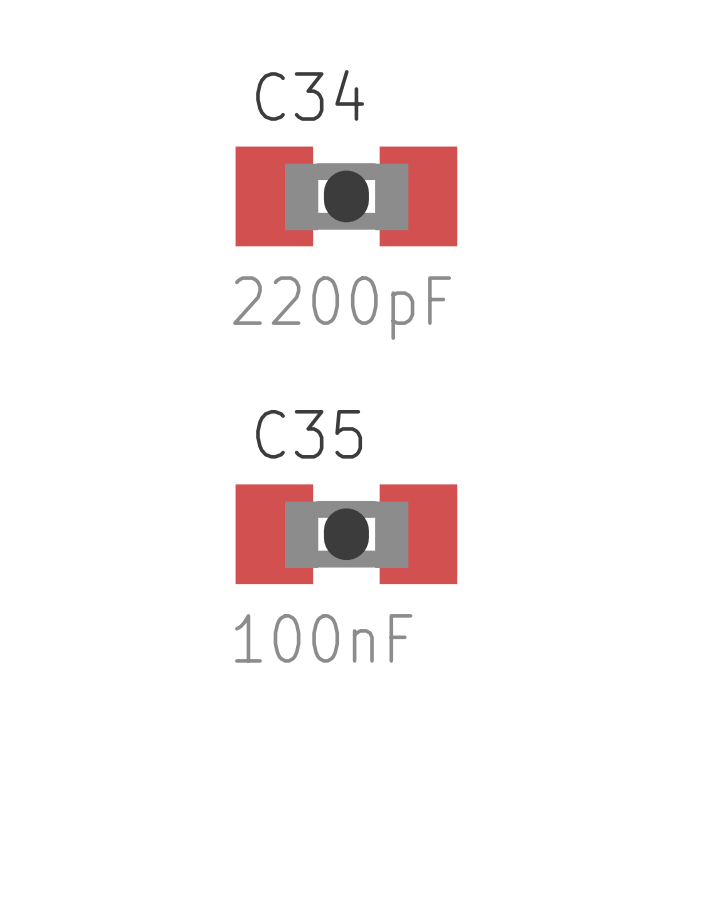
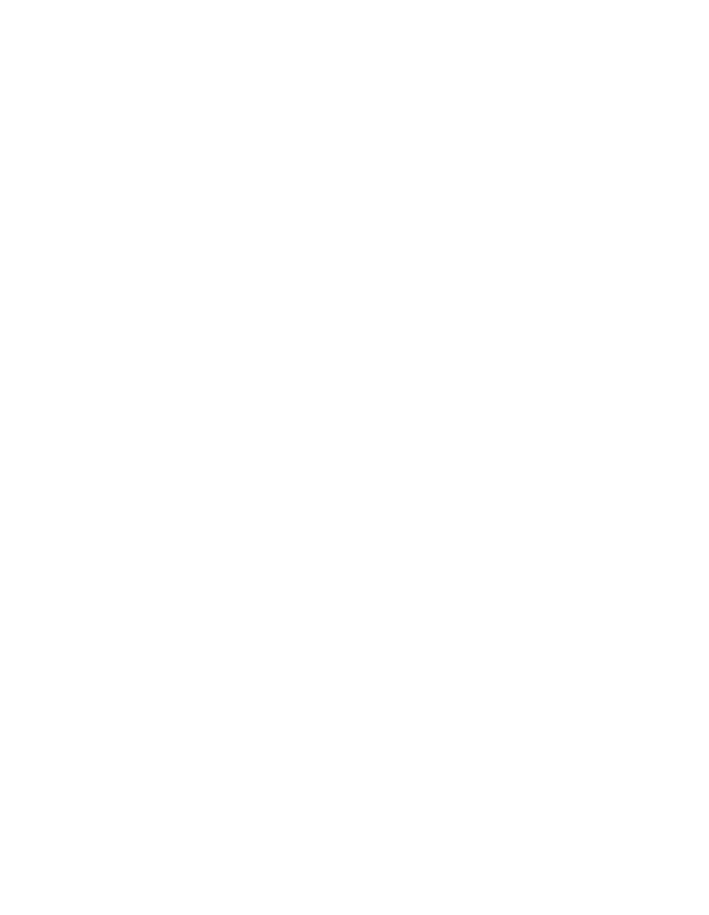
C34: 2200pF (346, 196) -> none
C35: 100nF (346, 534) -> none

